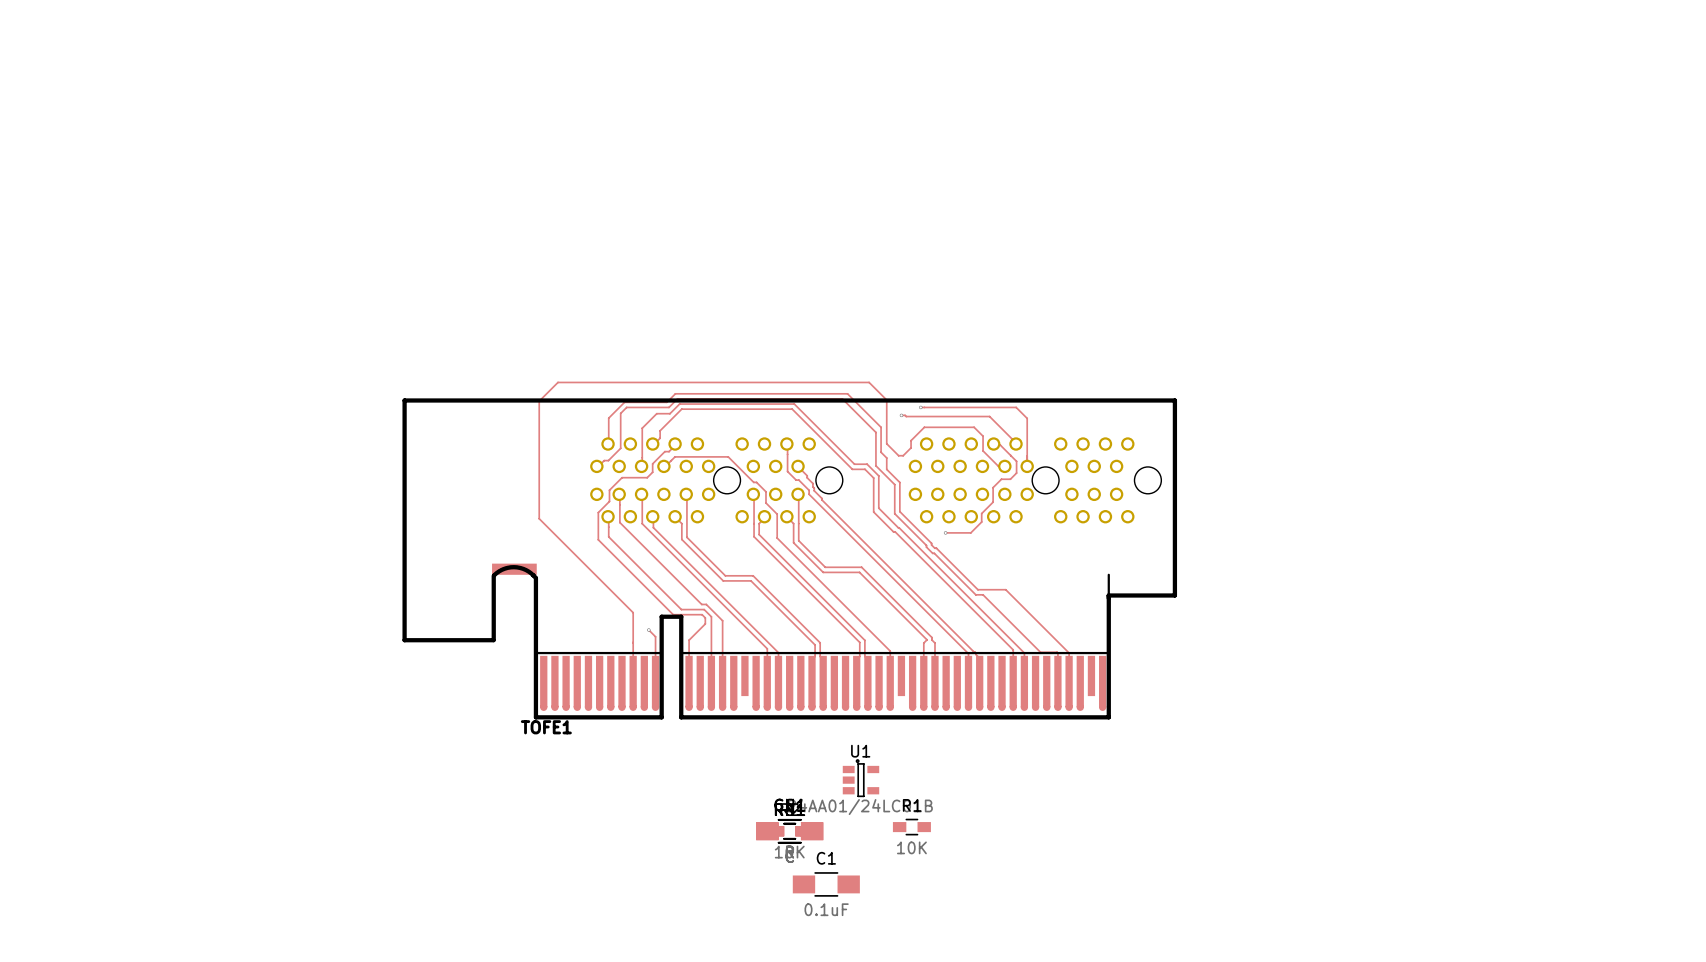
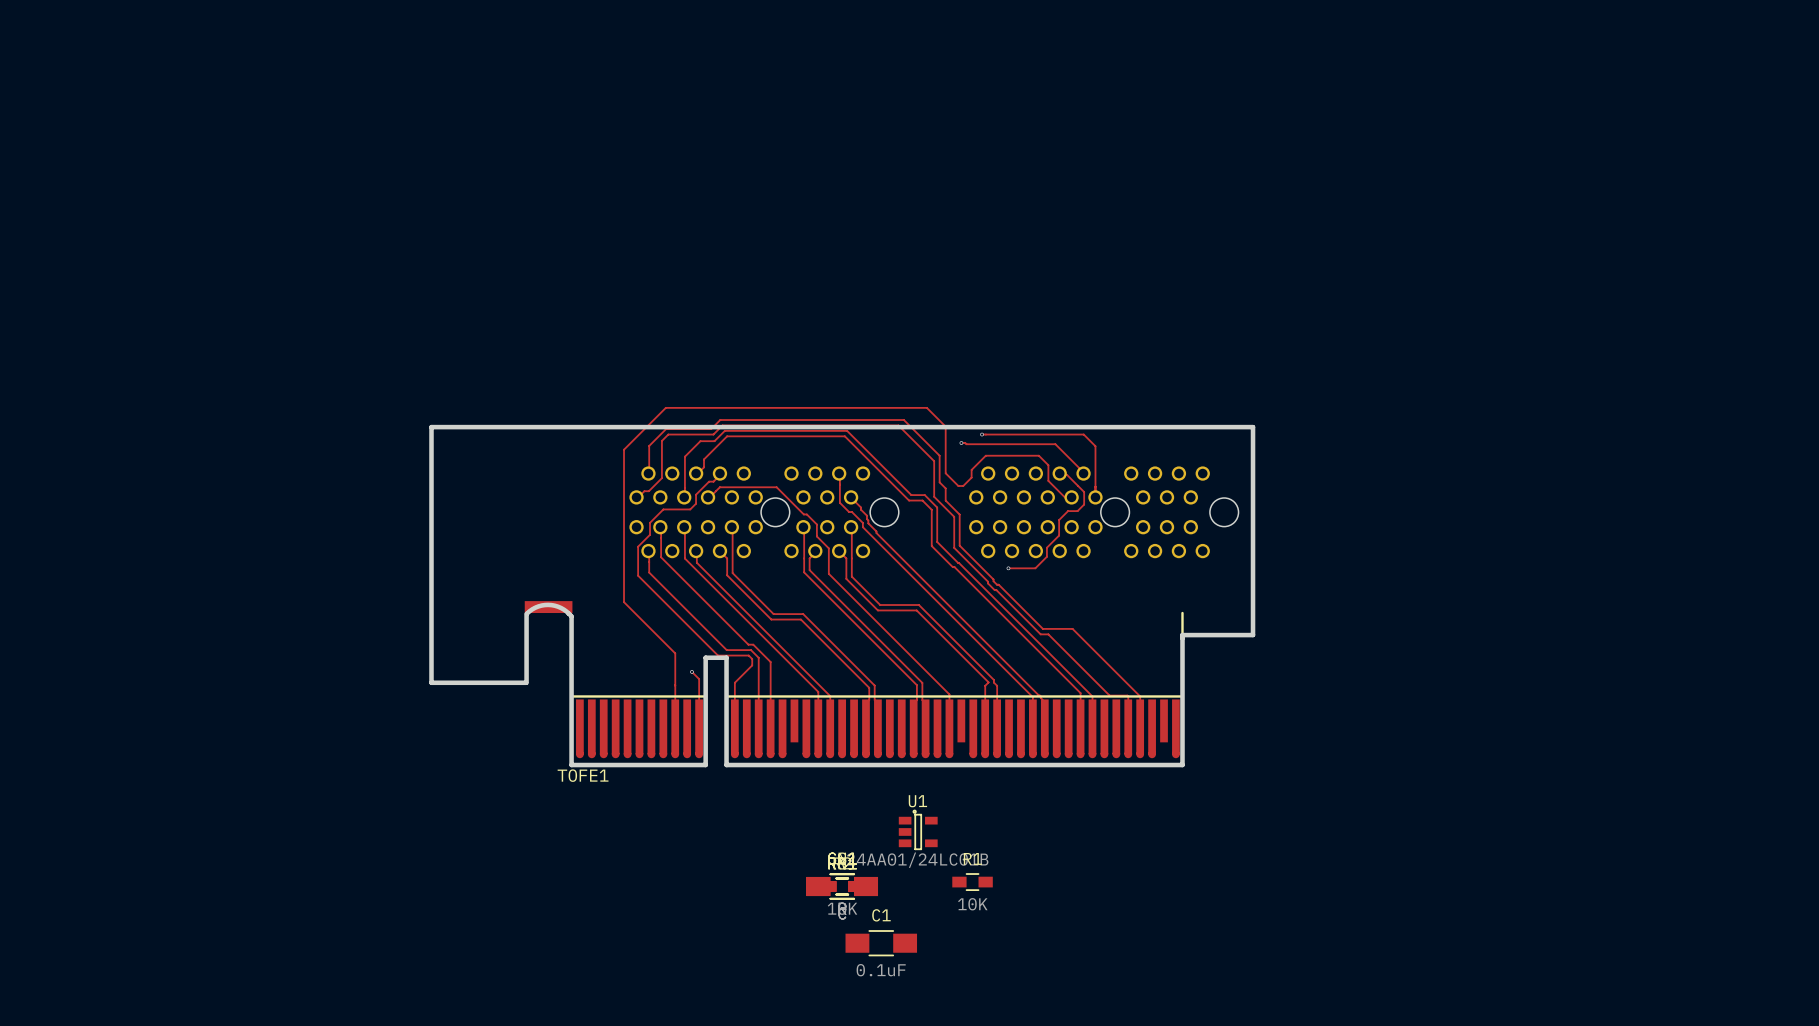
track: (624, 382) (557, 382) (539, 401) (539, 518) (585, 564) -> (665, 407) (624, 449) (624, 602)

